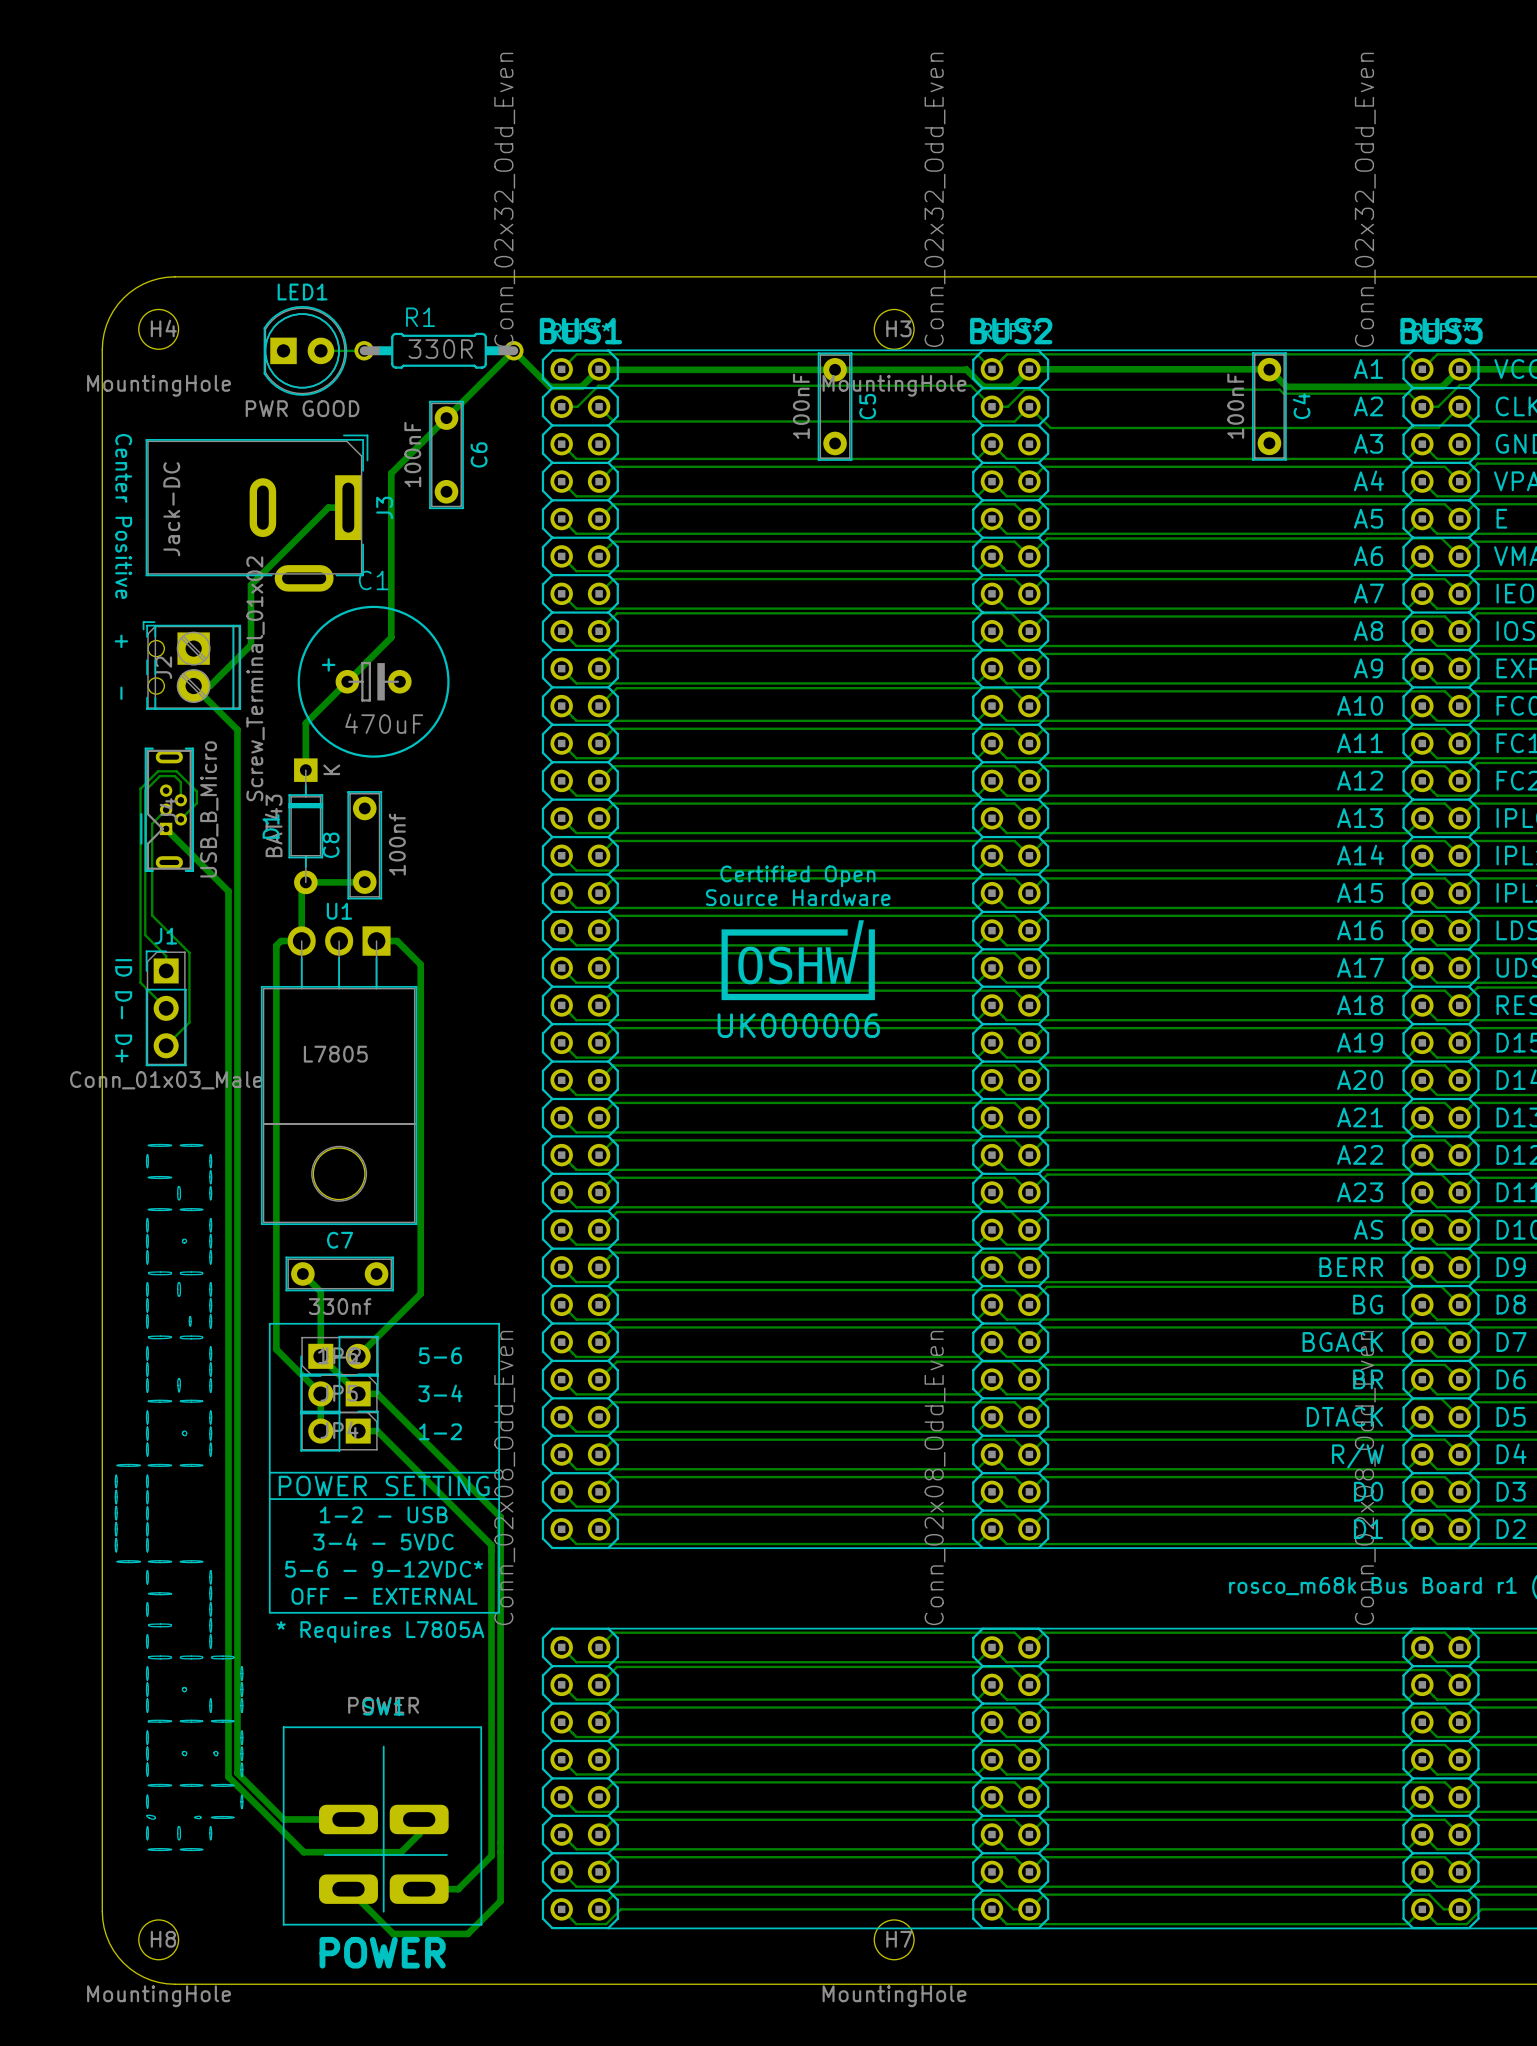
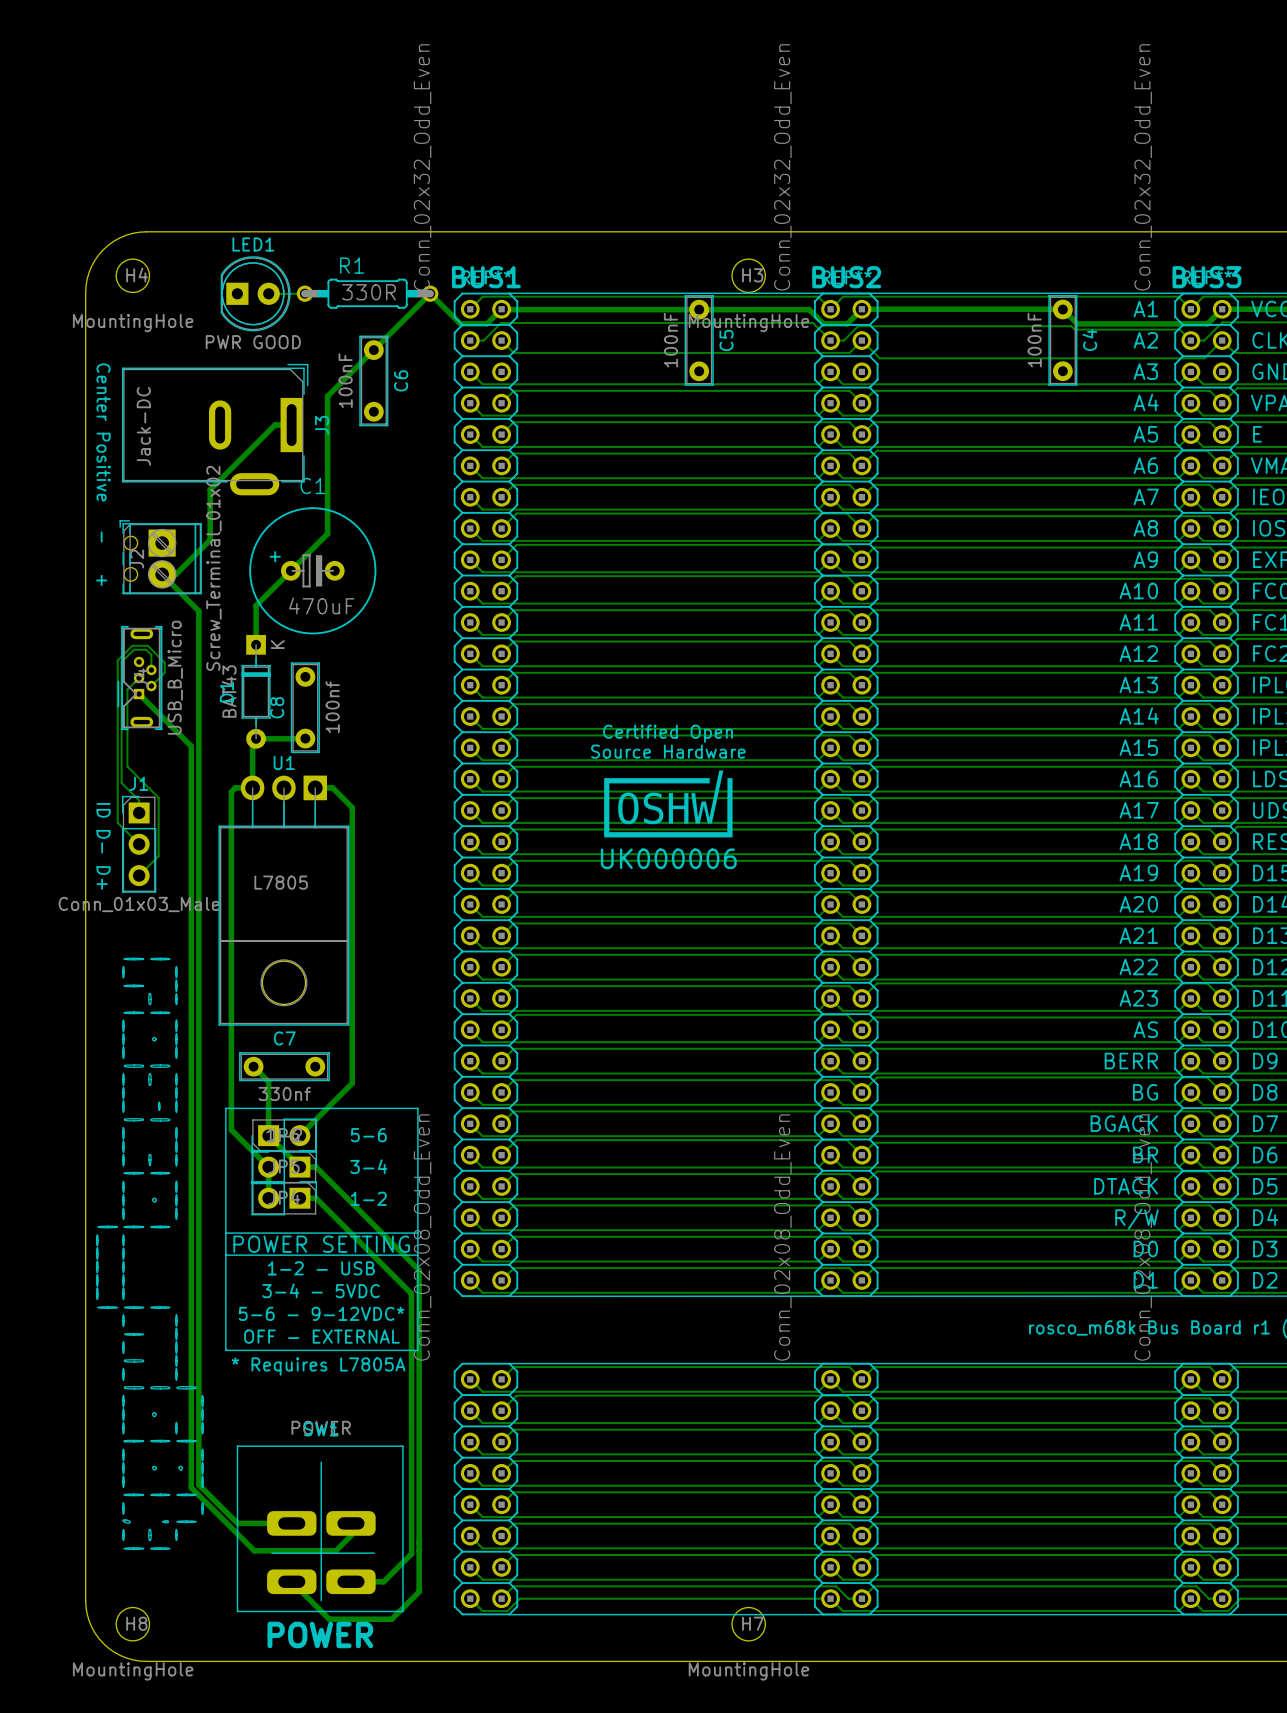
text: - + (121, 667) -> + - (101, 558)

